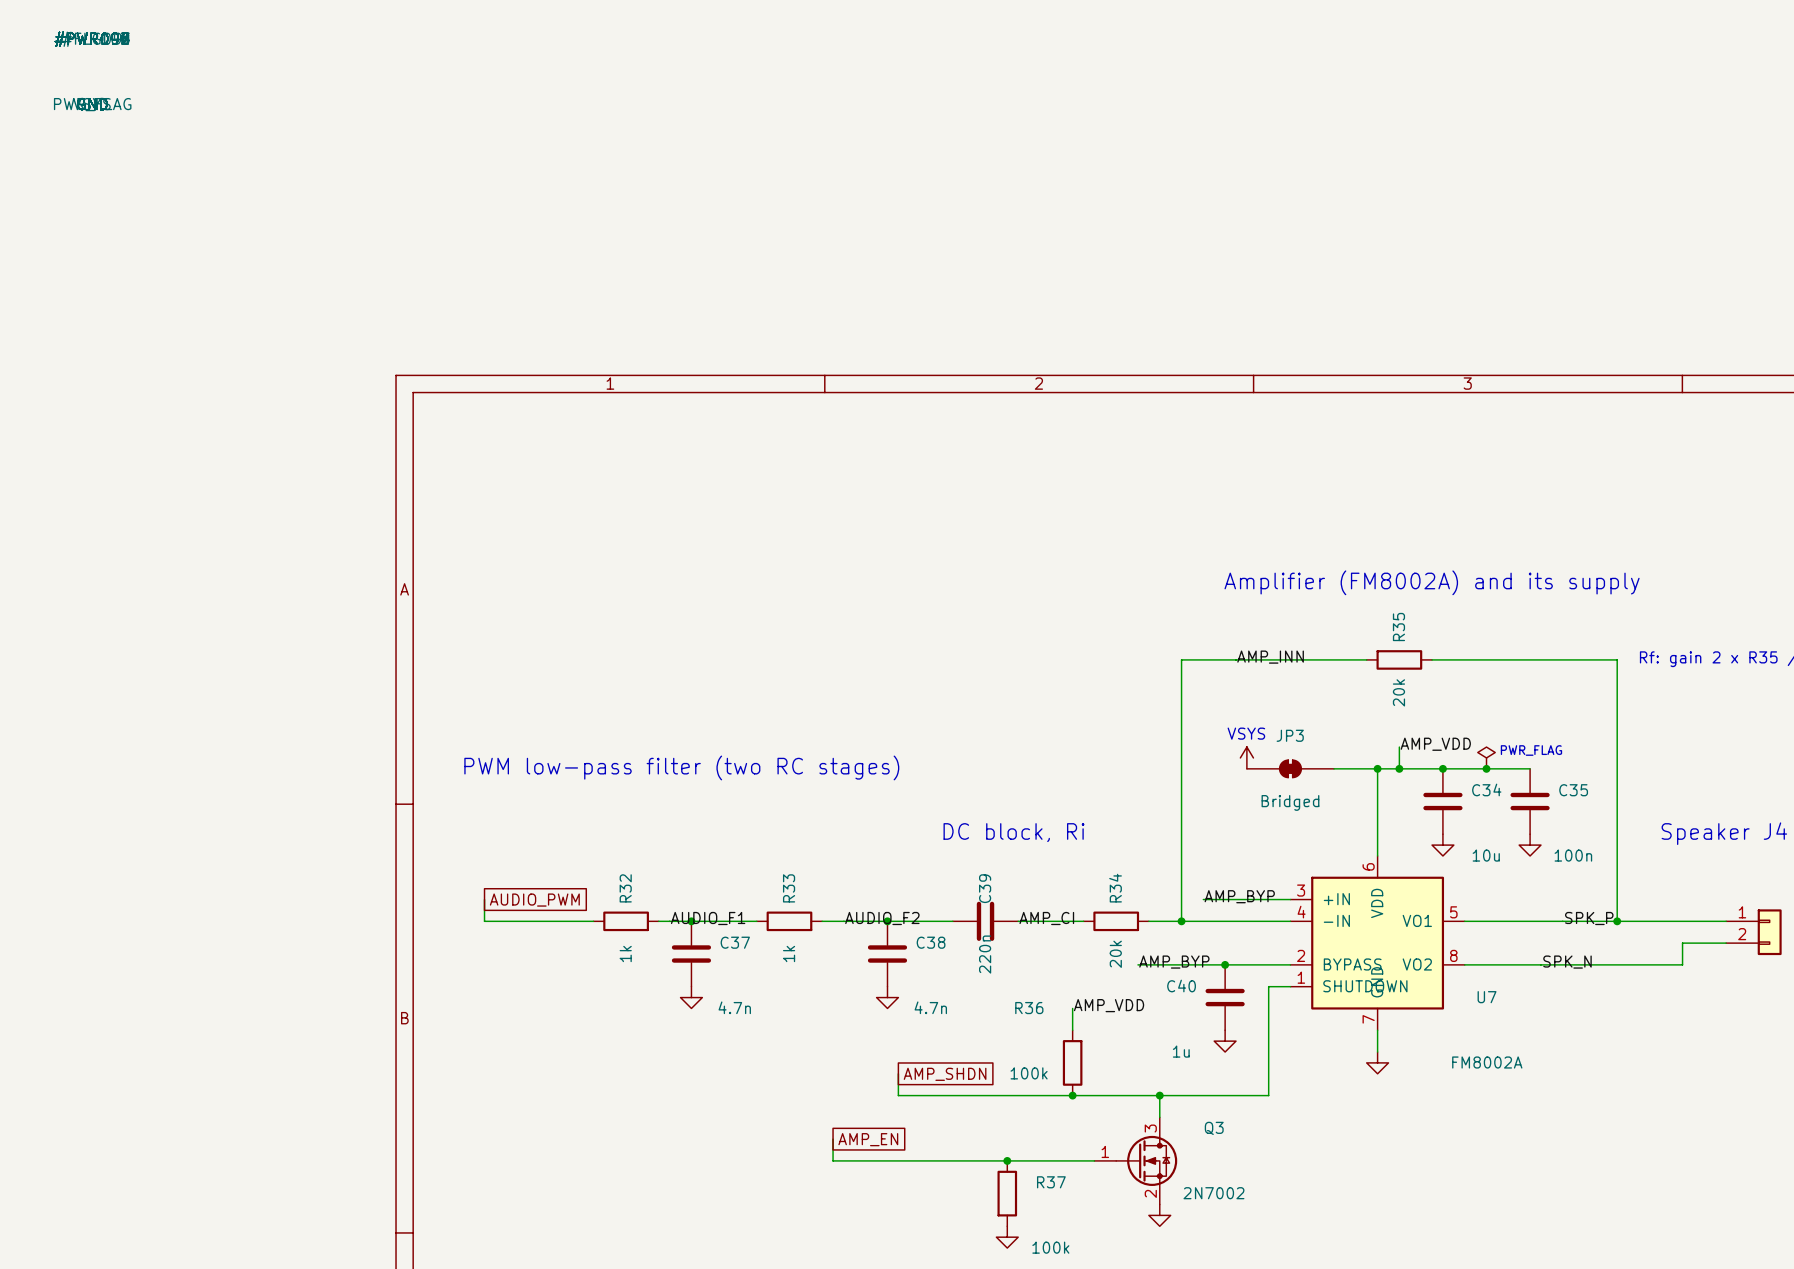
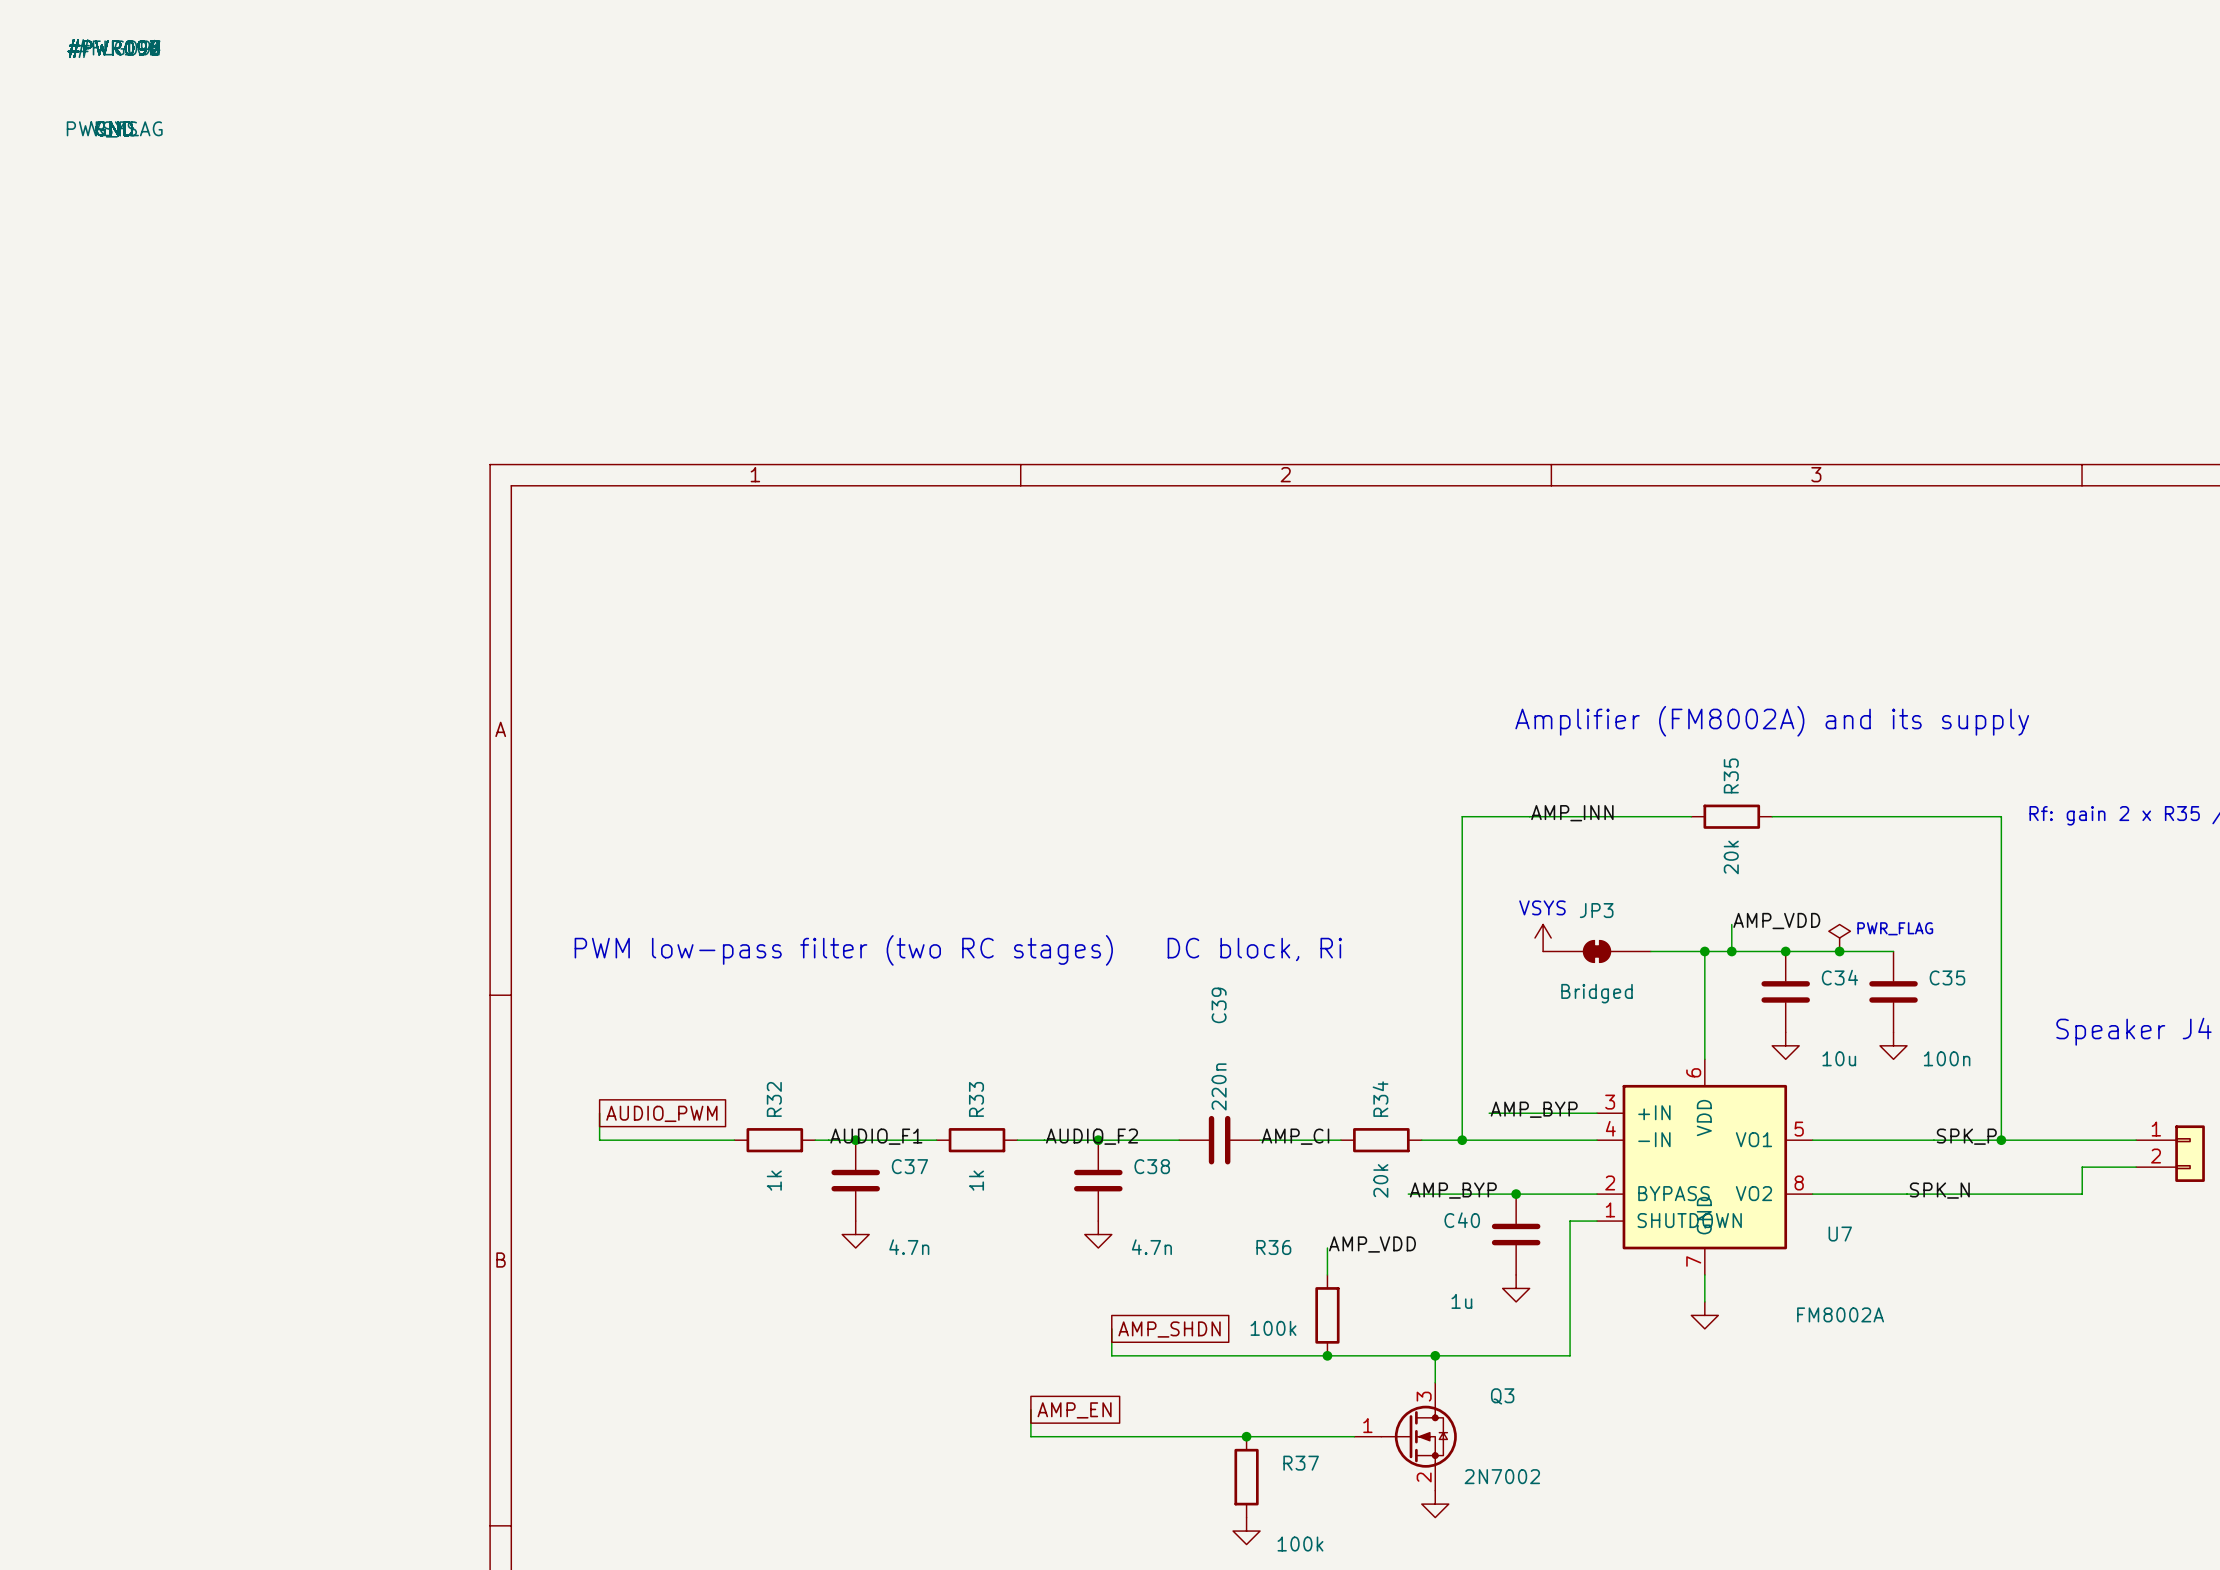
text position: DC block, Ri (1013, 832) -> DC block, Ri (1254, 949)
C39 name position: C39 (985, 888) -> C39 (1219, 1005)
C39 value position: 220n (985, 954) -> 220n (1219, 1086)

